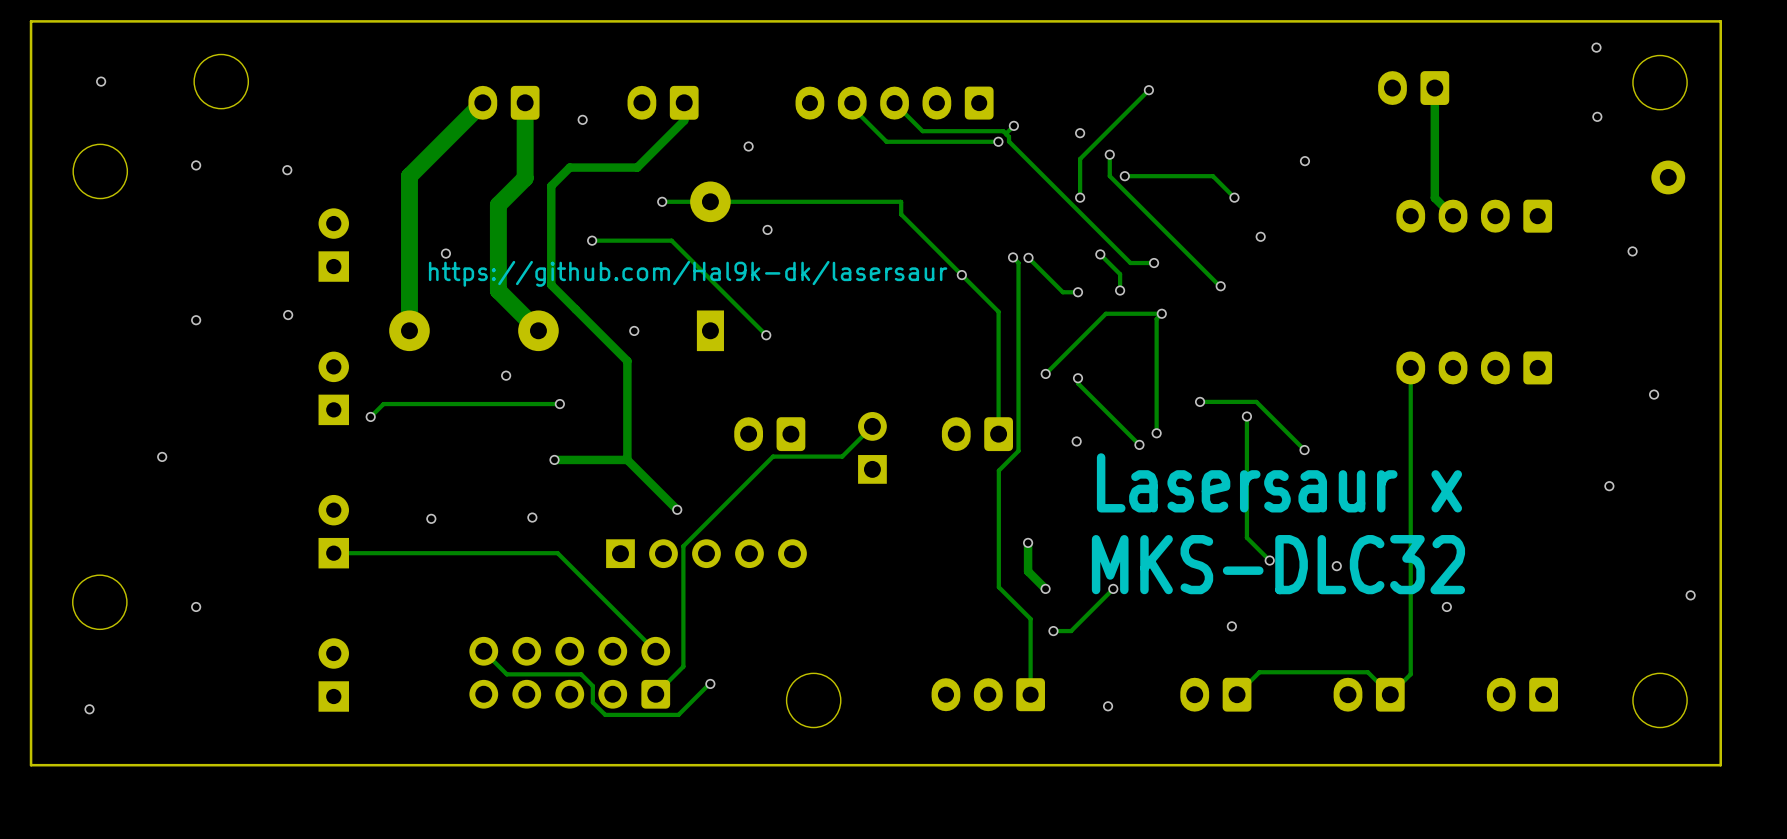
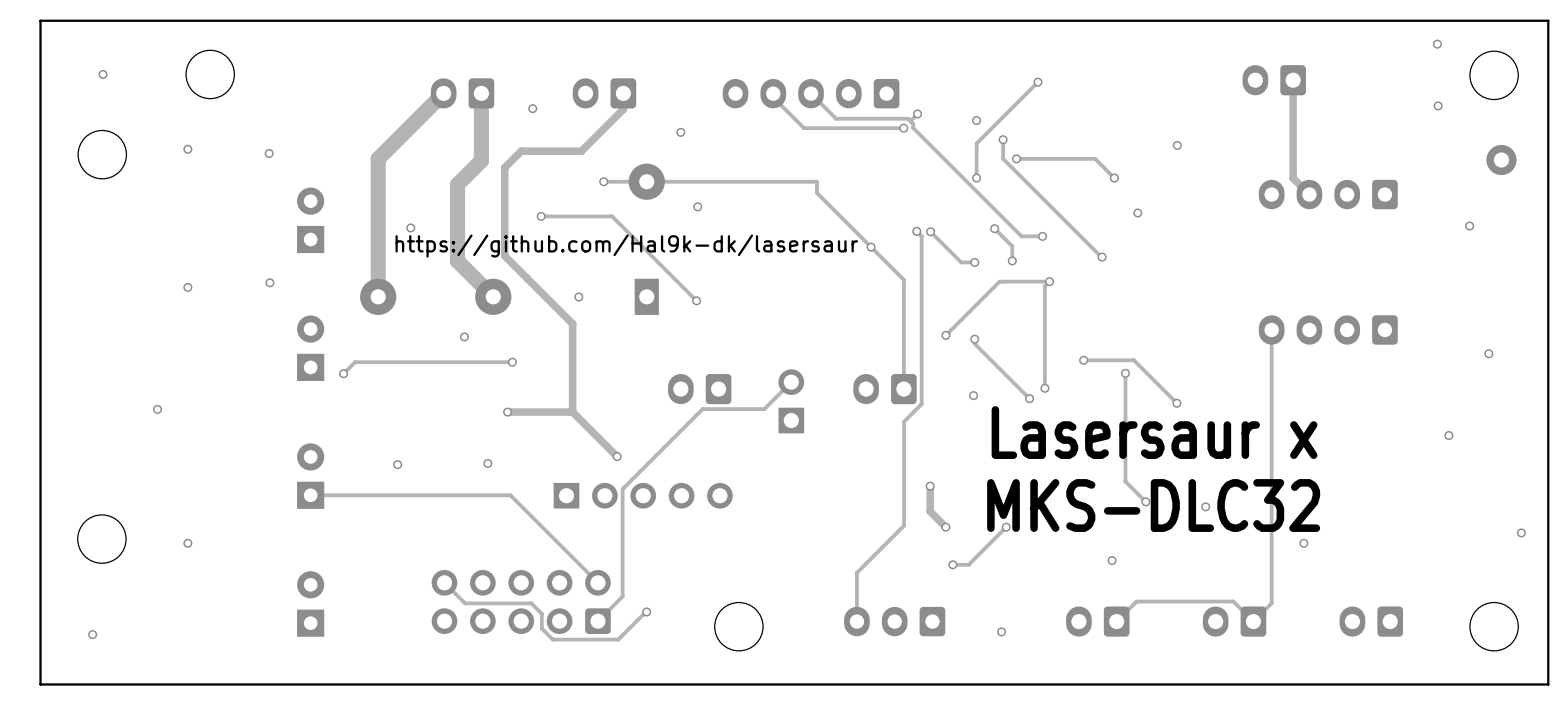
track: (998, 587) (1030, 618) (1030, 694) -> (904, 525) (856, 572) (856, 621)

